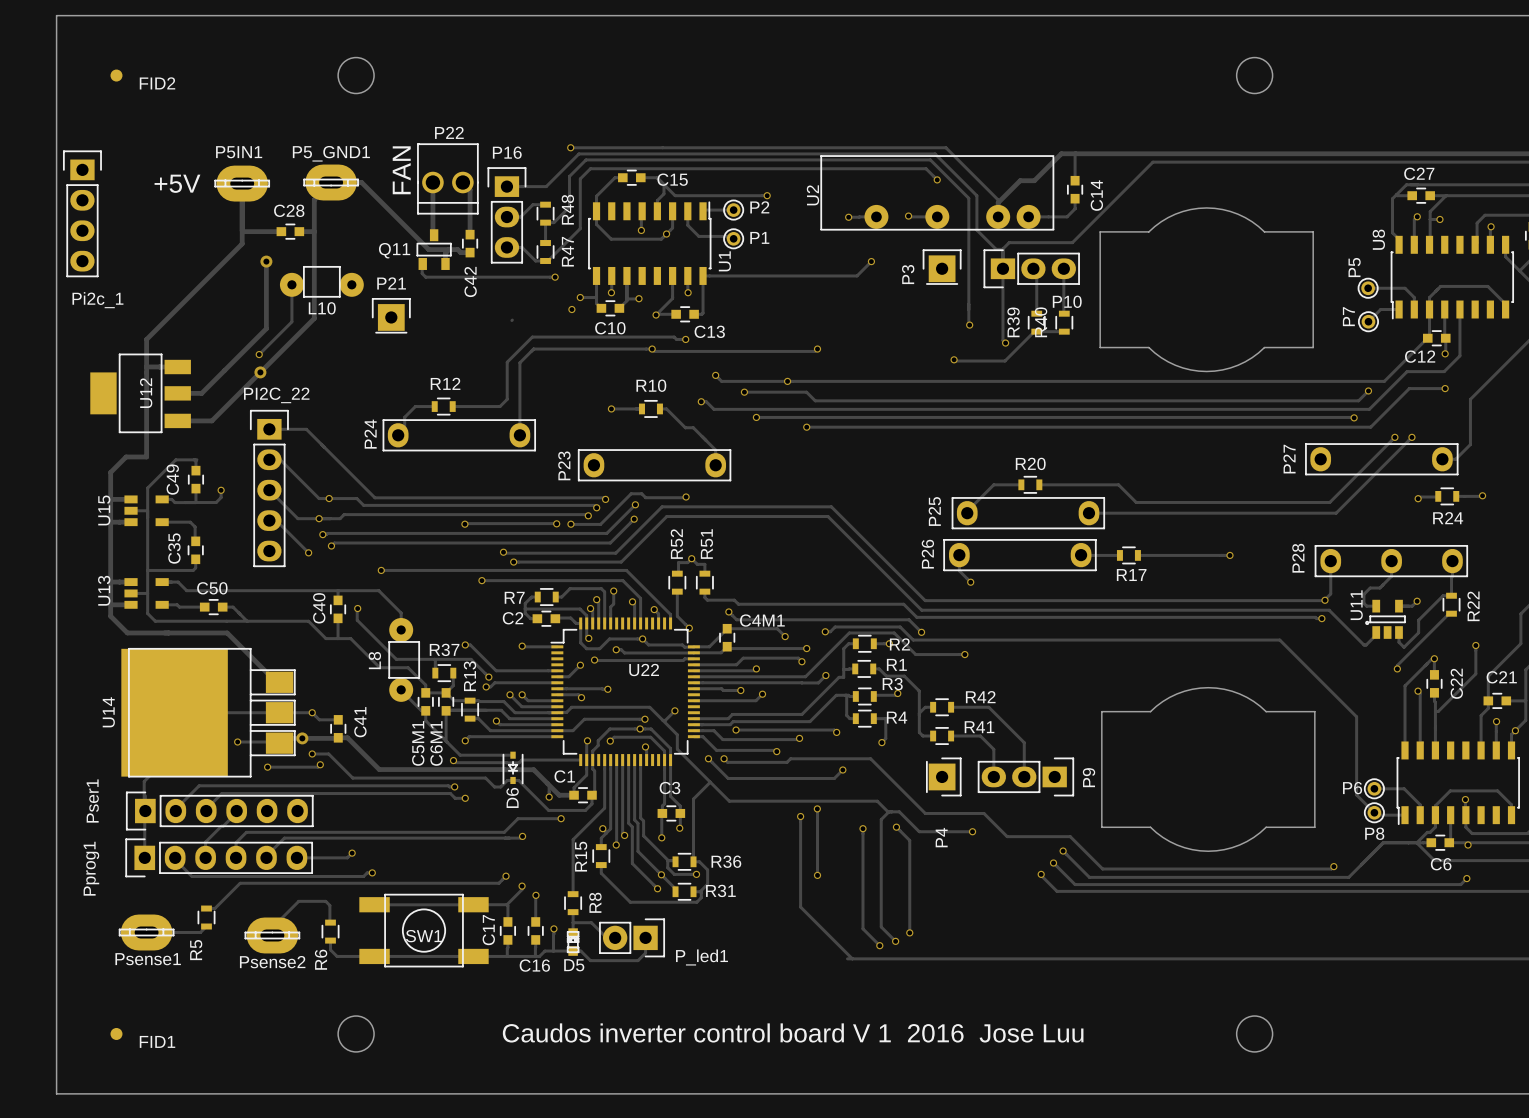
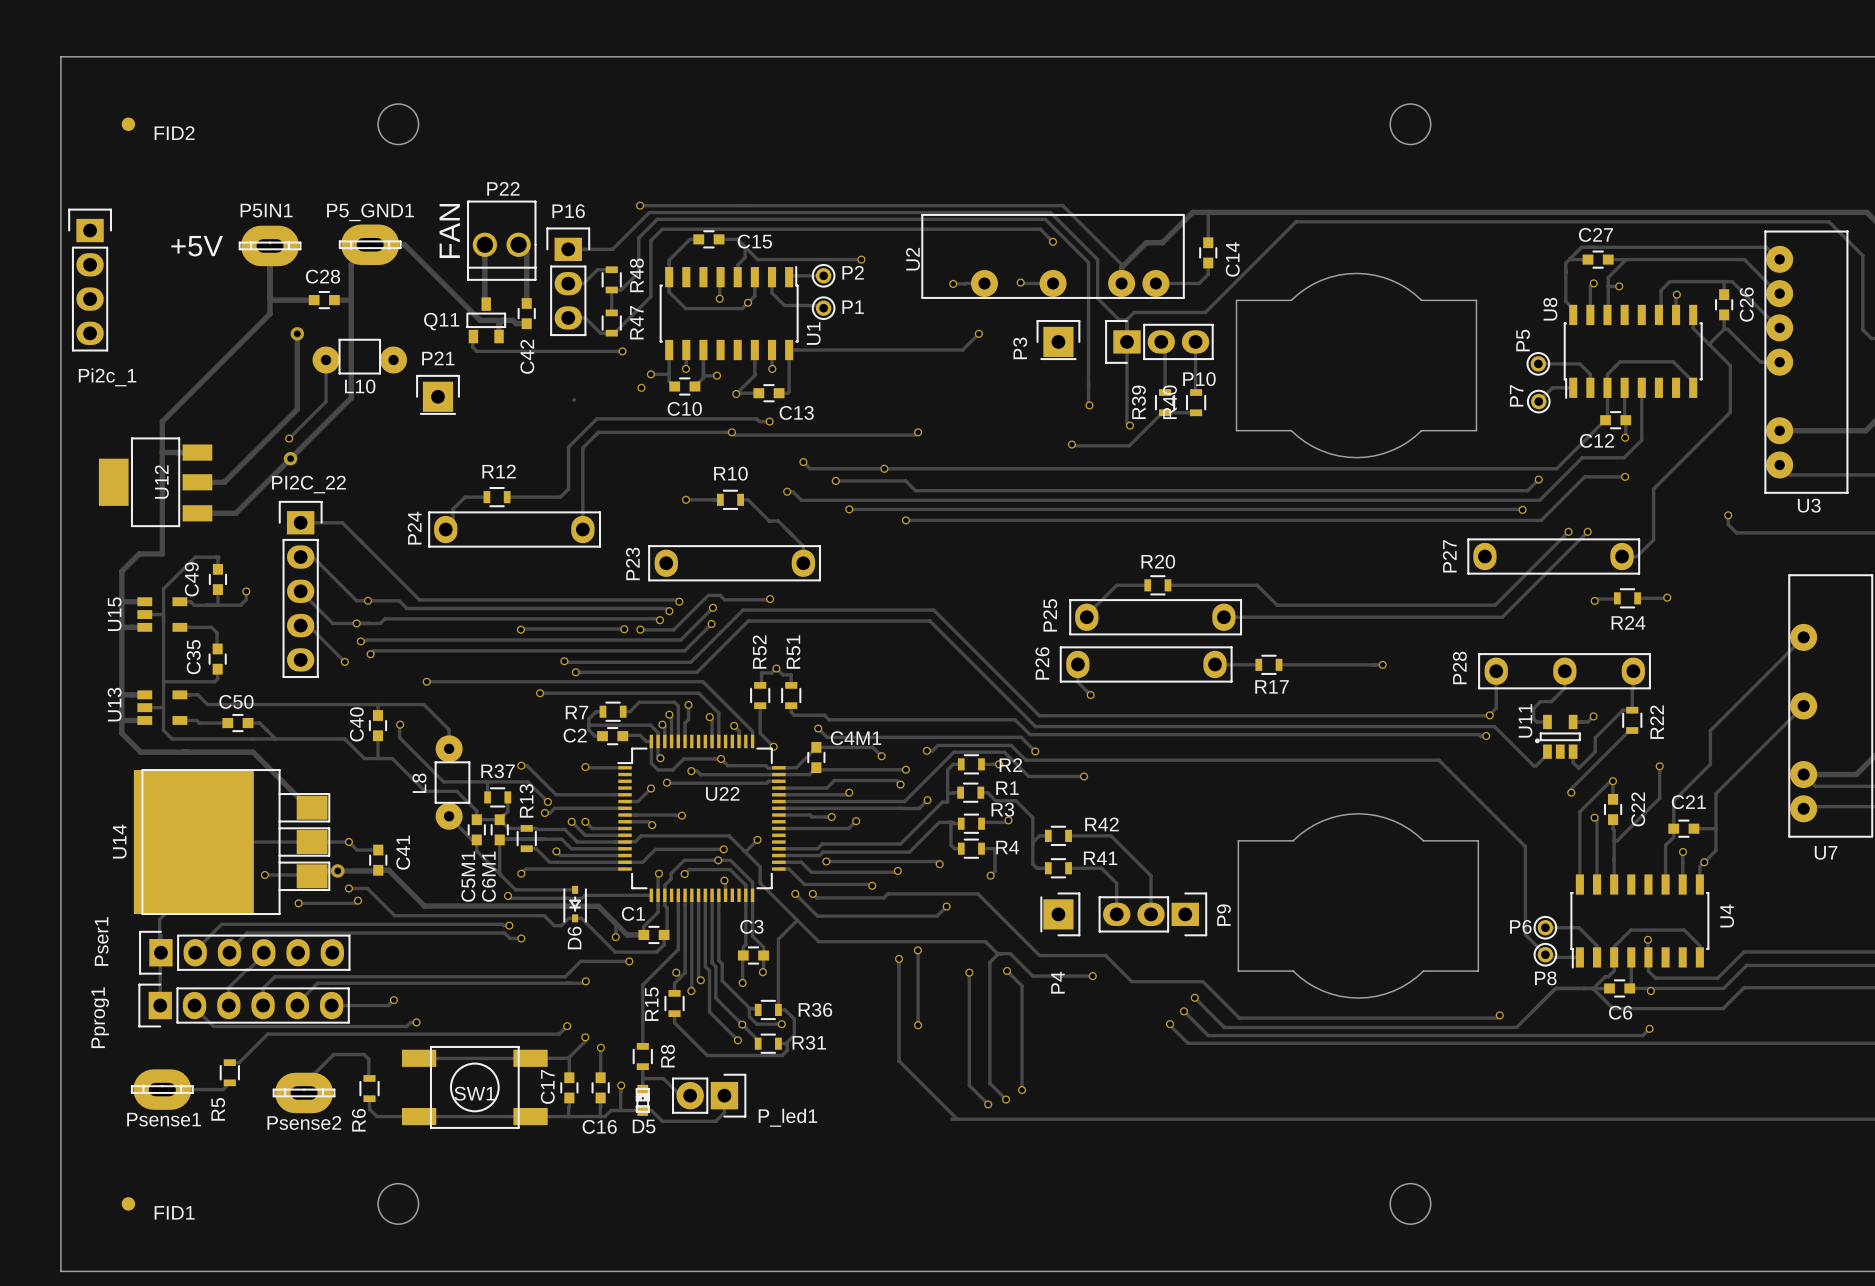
text: Caudos inverter control board V 1 2016 Jose Luu (793, 1032) -> none

